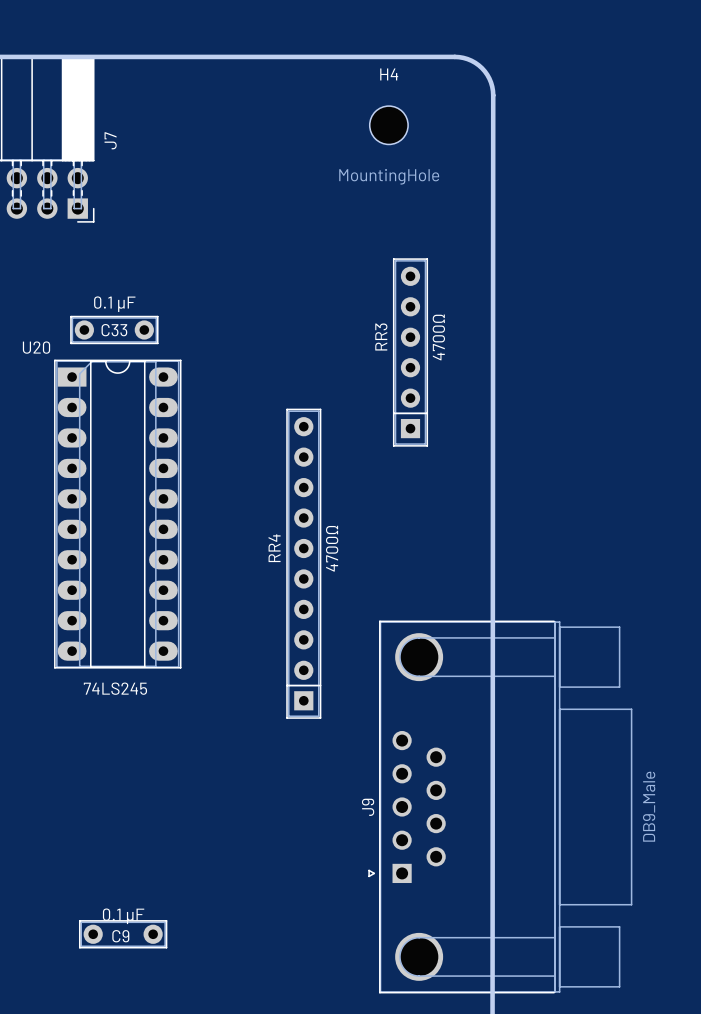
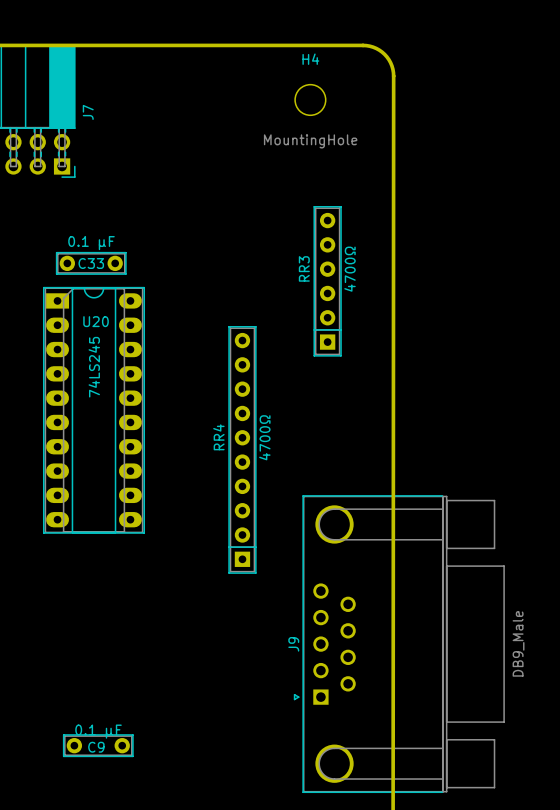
U20 name position: U20 (36, 347) -> U20 (96, 321)
U20 value rotation: 0° (115, 688) -> 90° counterclockwise (94, 367)
U20 value position: 74LS245 (115, 688) -> 74LS245 (94, 367)

